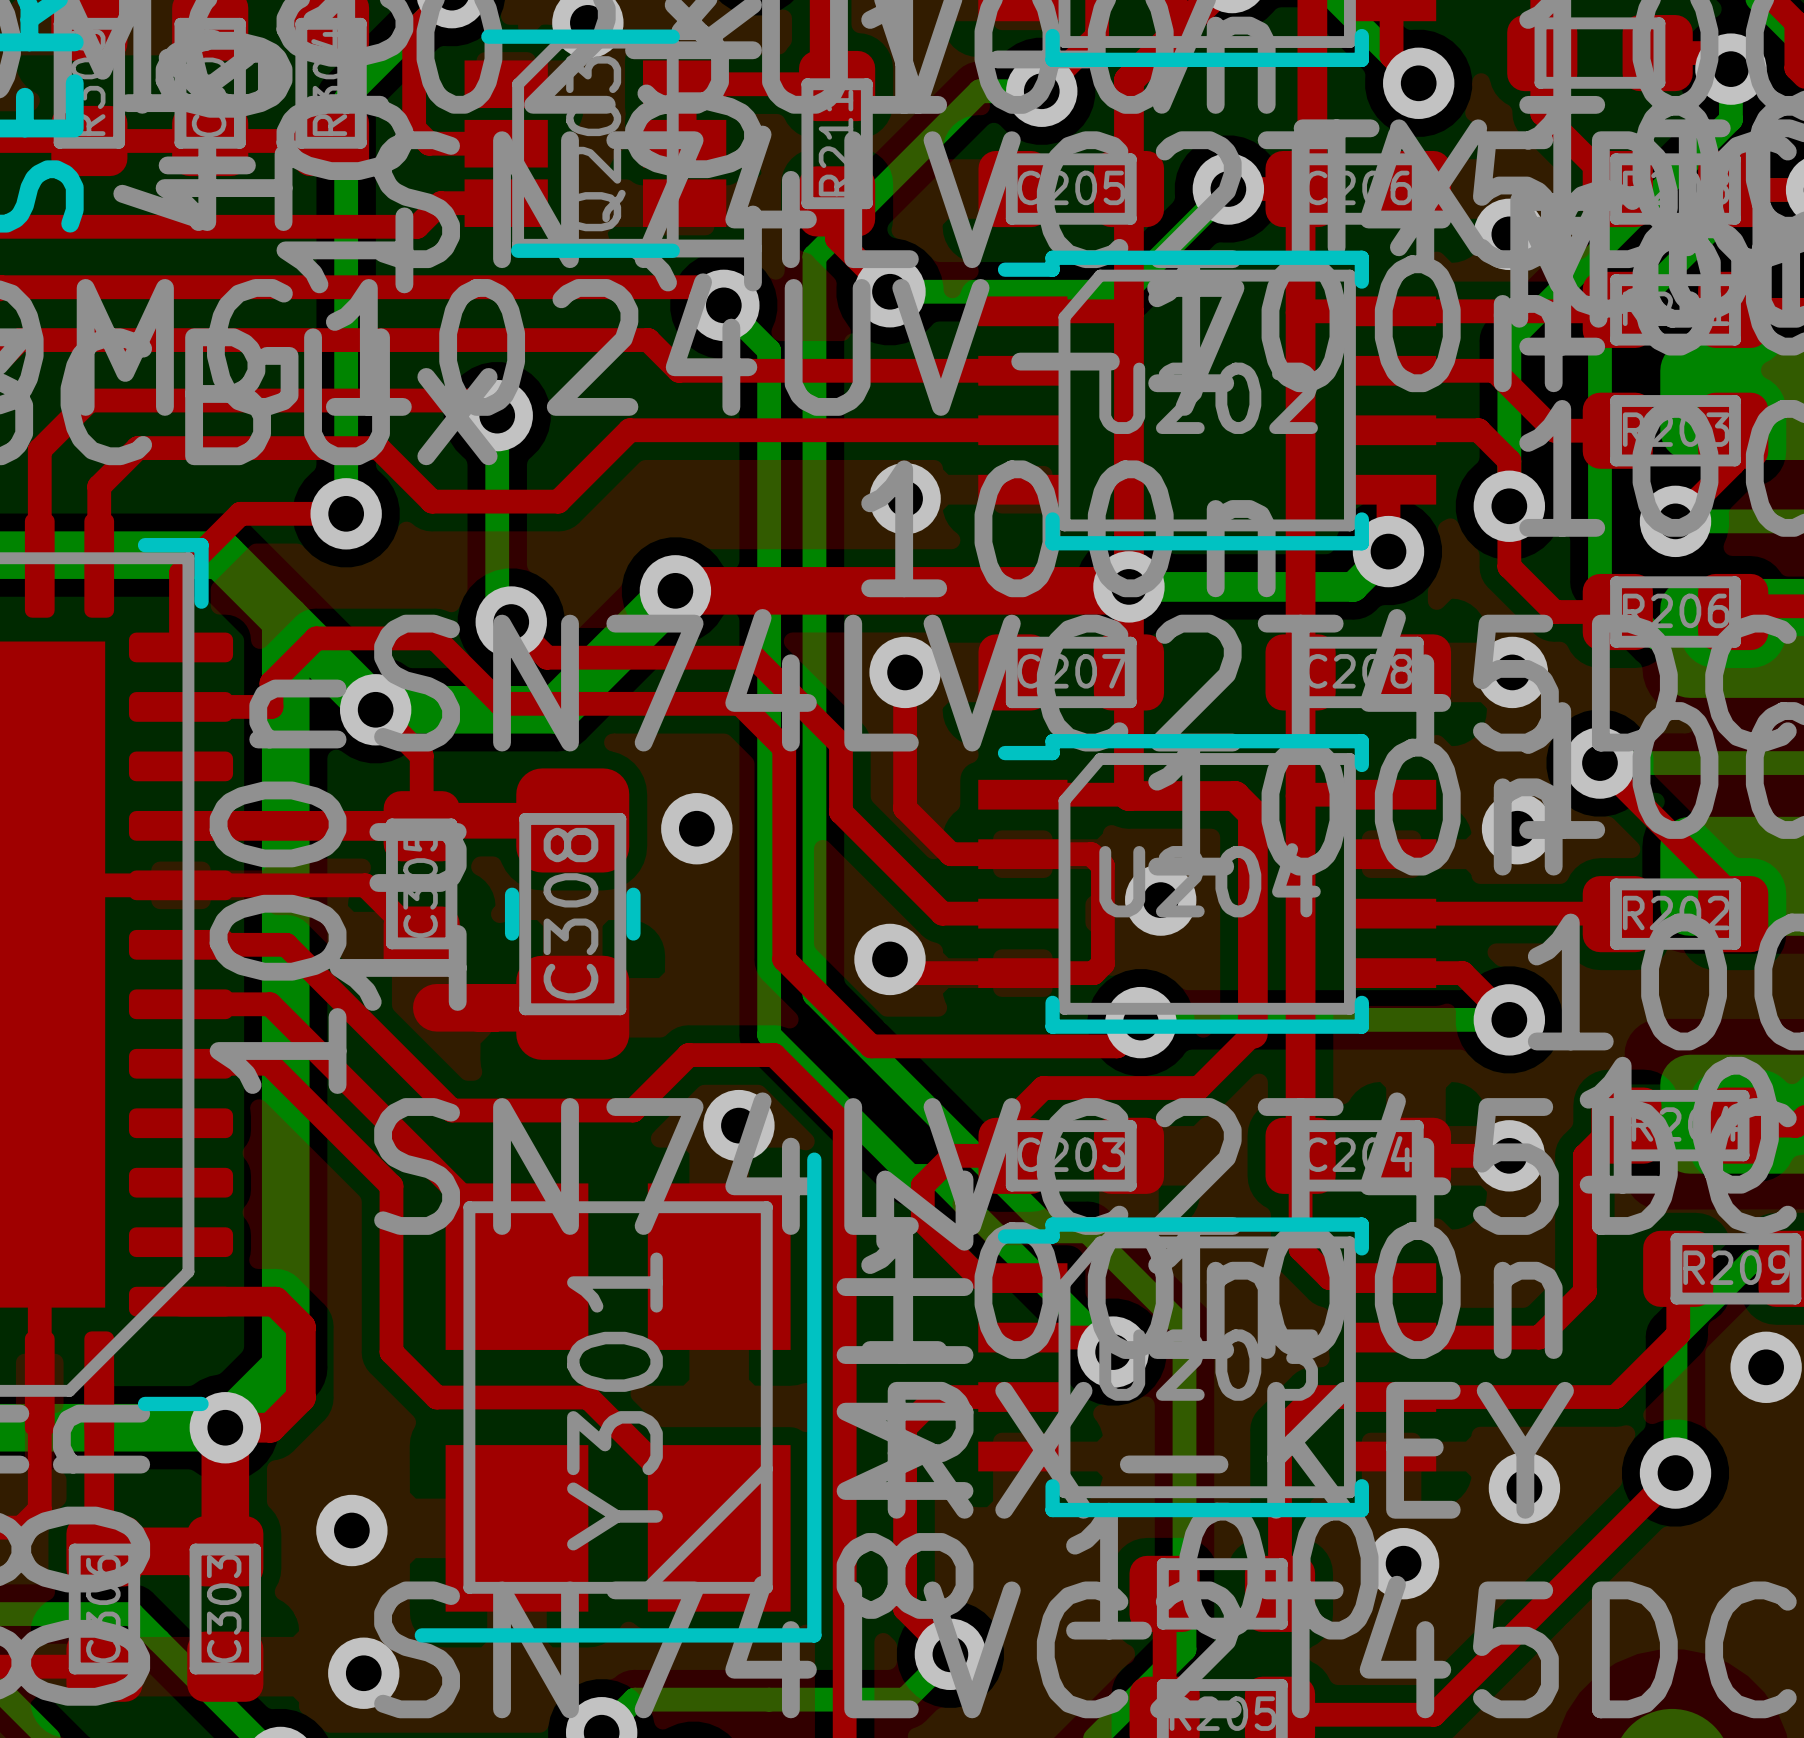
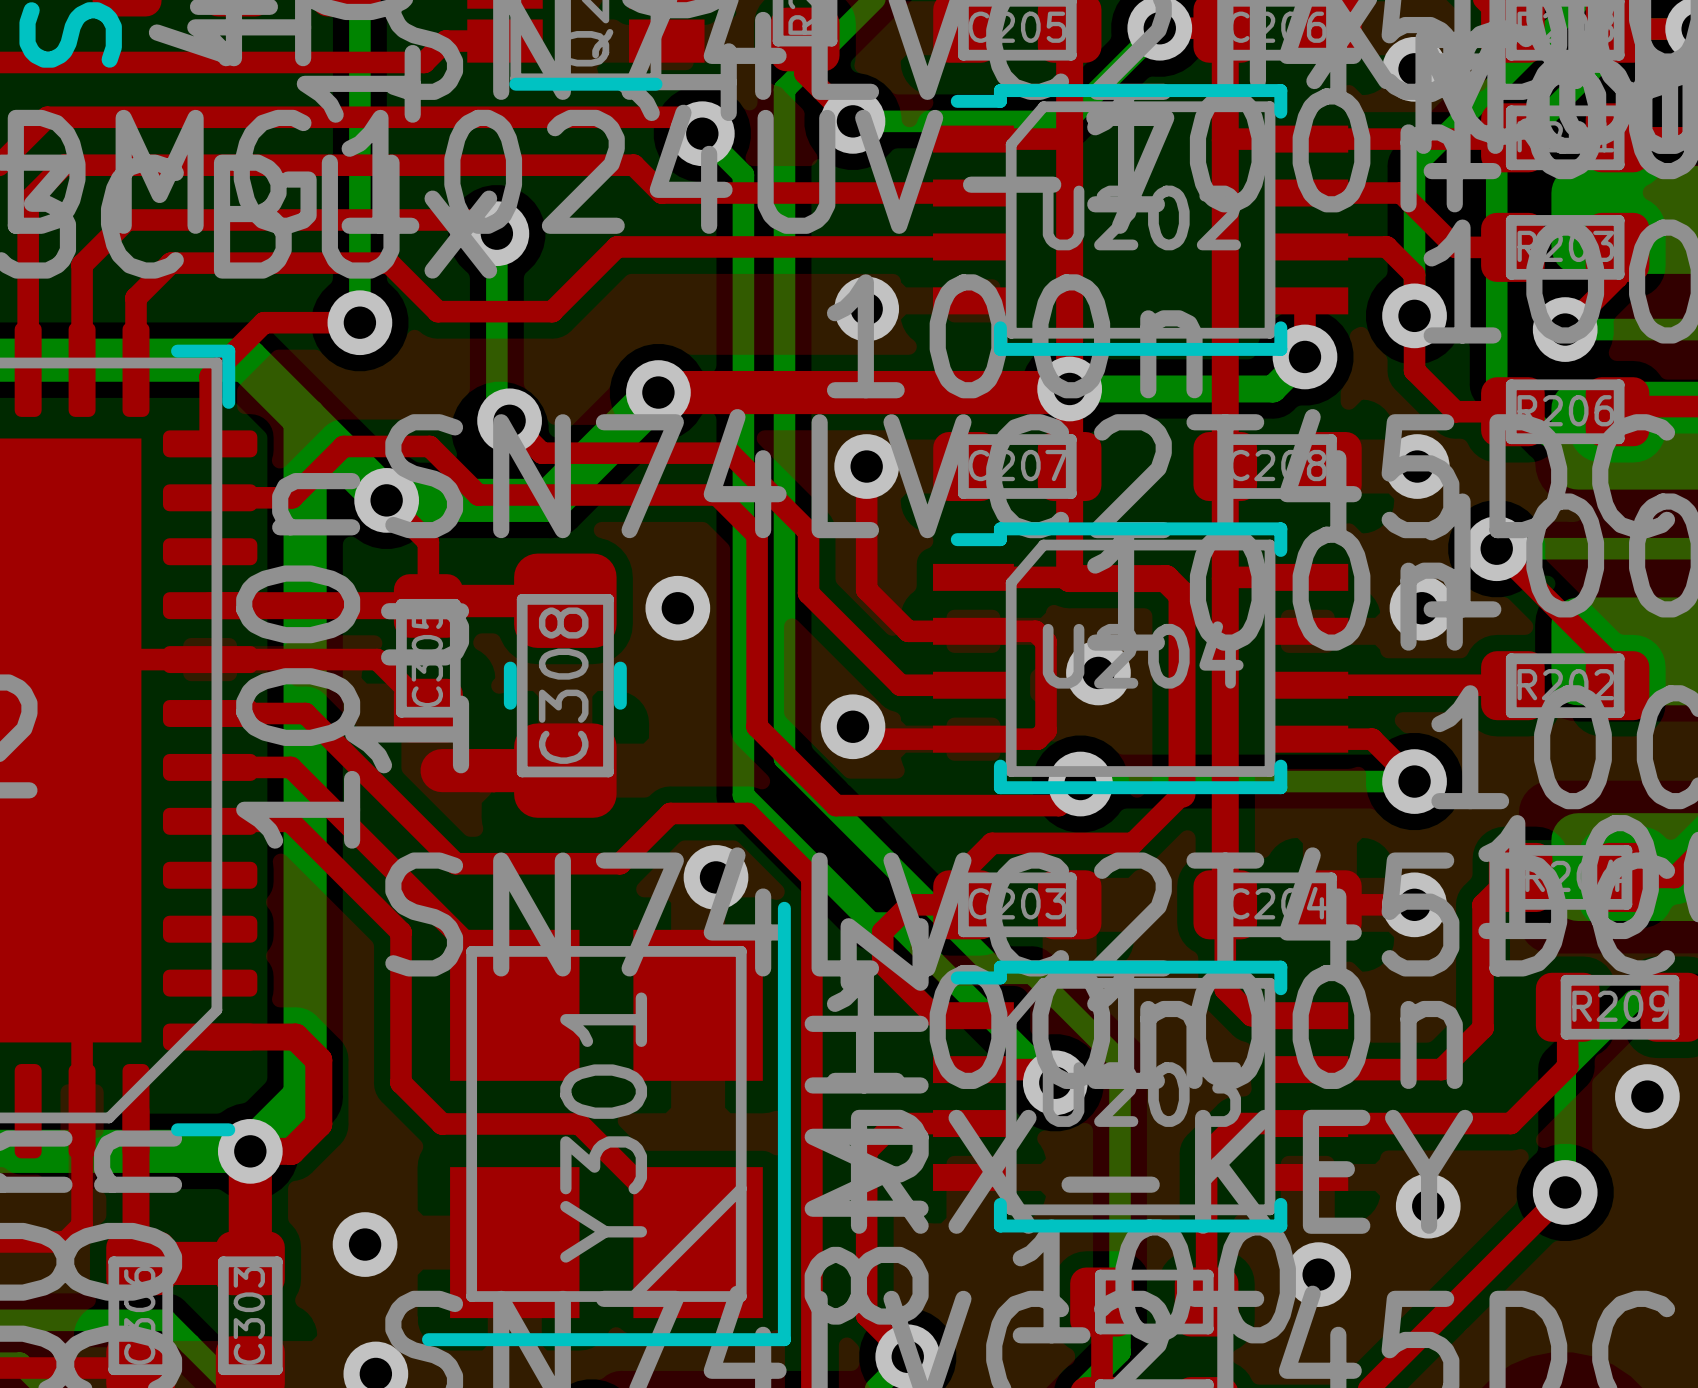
top track: (500, 703) (435, 638) (316, 638) (271, 683) (271, 706) -> (499, 495) (478, 495) (429, 446) (343, 446) (292, 497)

